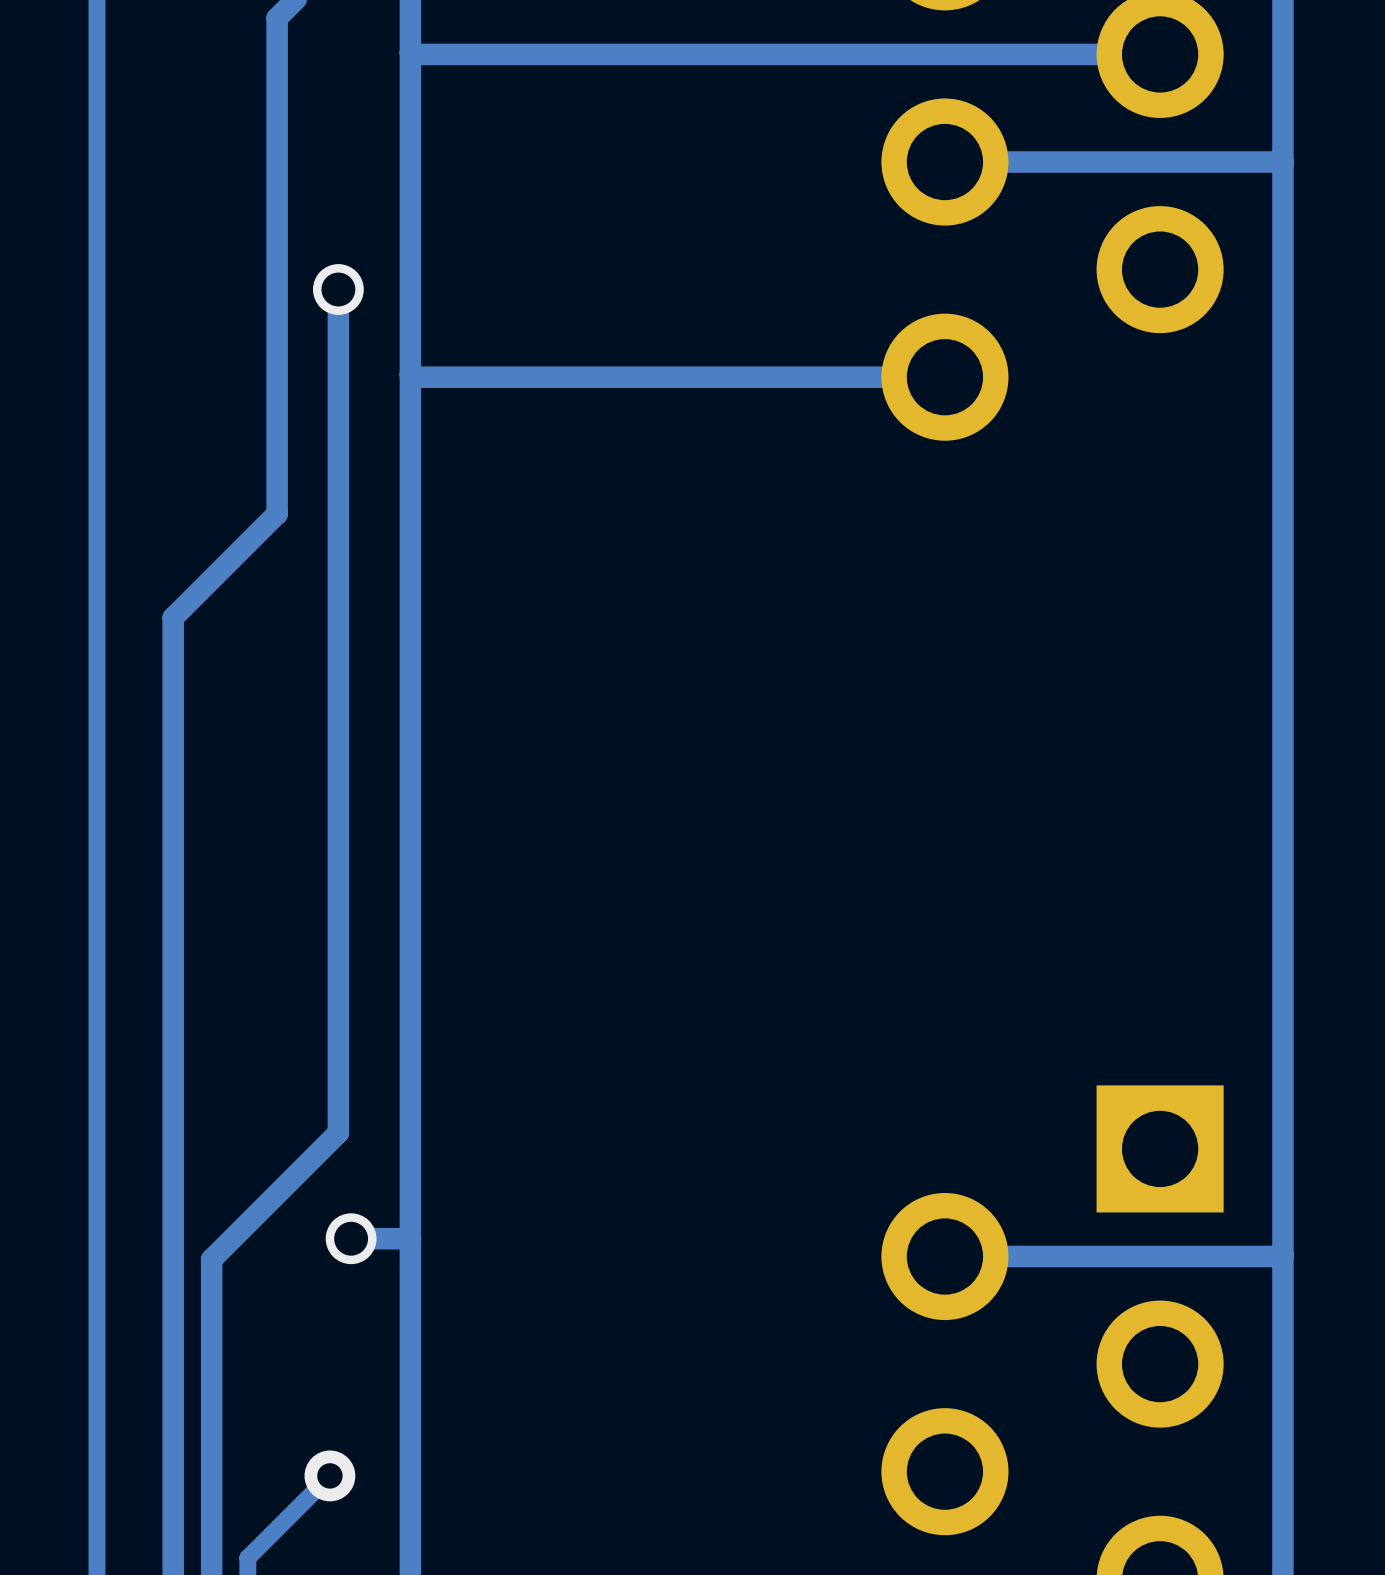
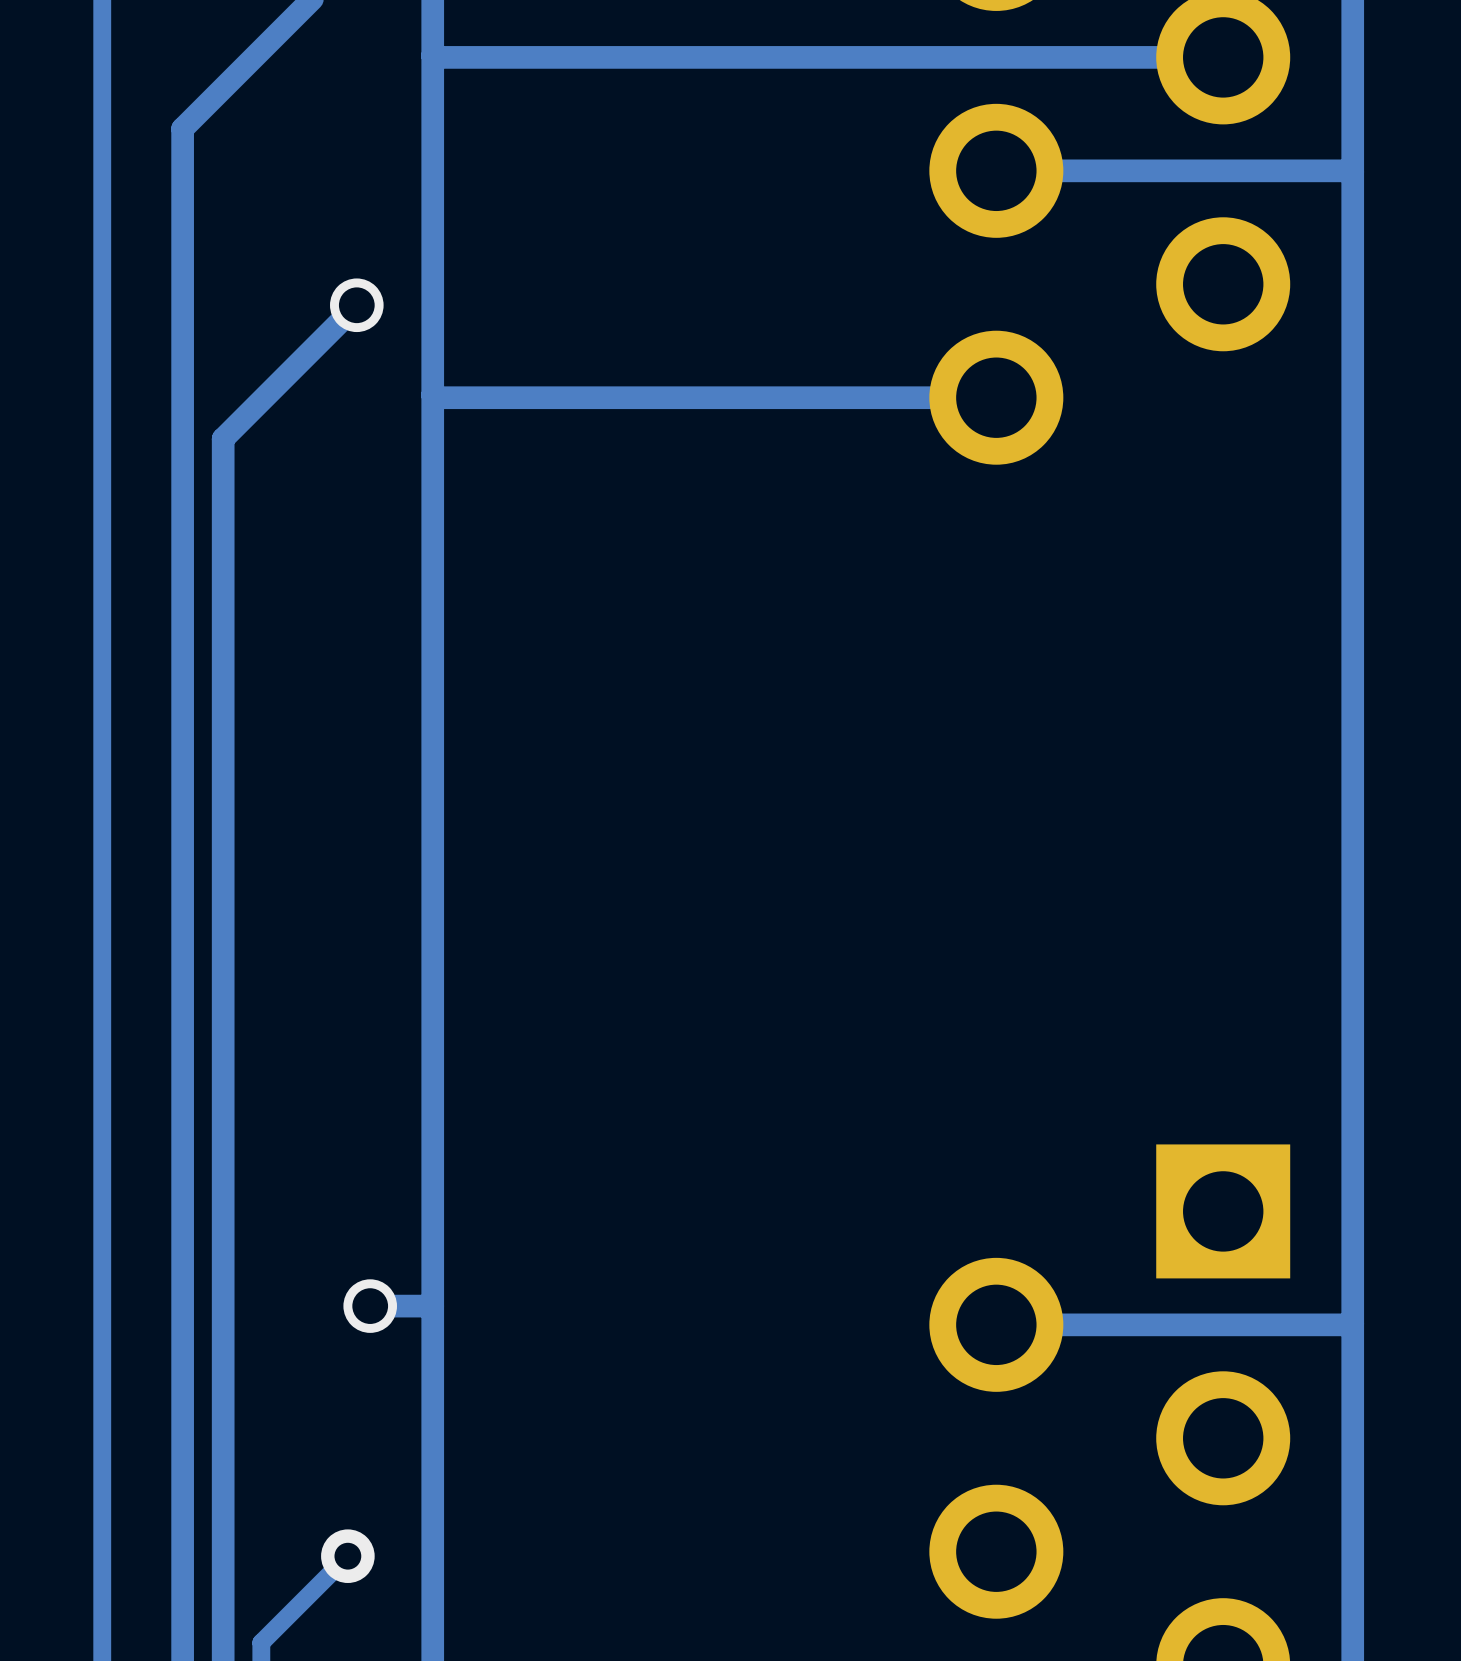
track: (277, 18) (277, 513) (173, 617) -> (292, 19) (182, 128) (182, 651)
track: (338, 289) (338, 1132) (211, 1259) -> (356, 305) (223, 438) (223, 1328)

